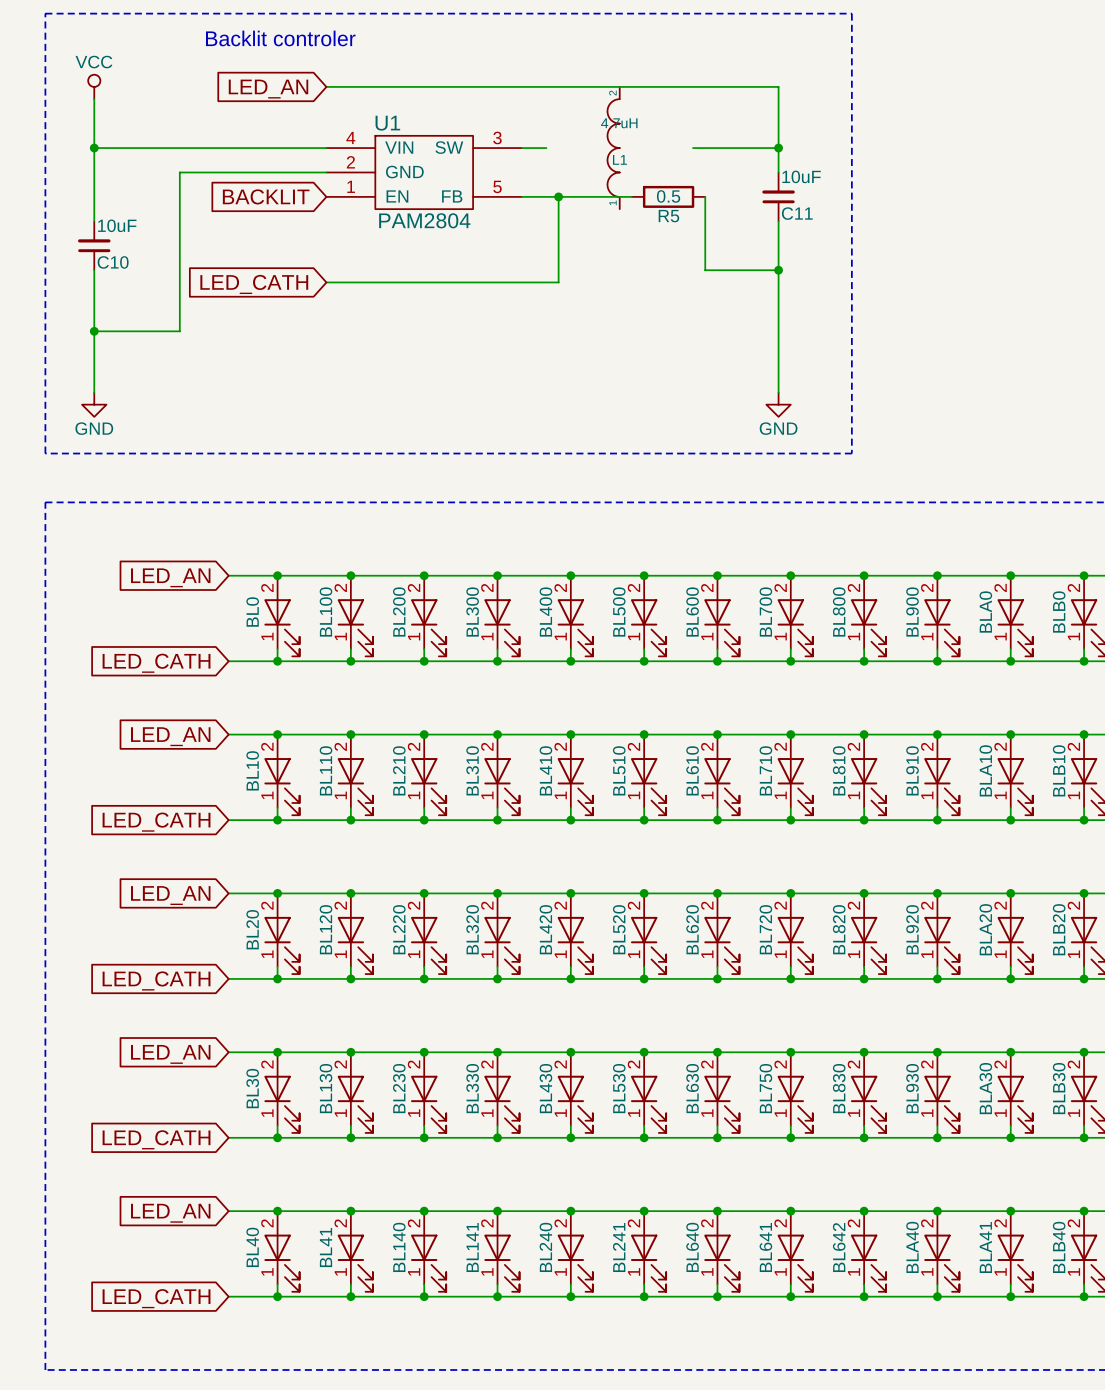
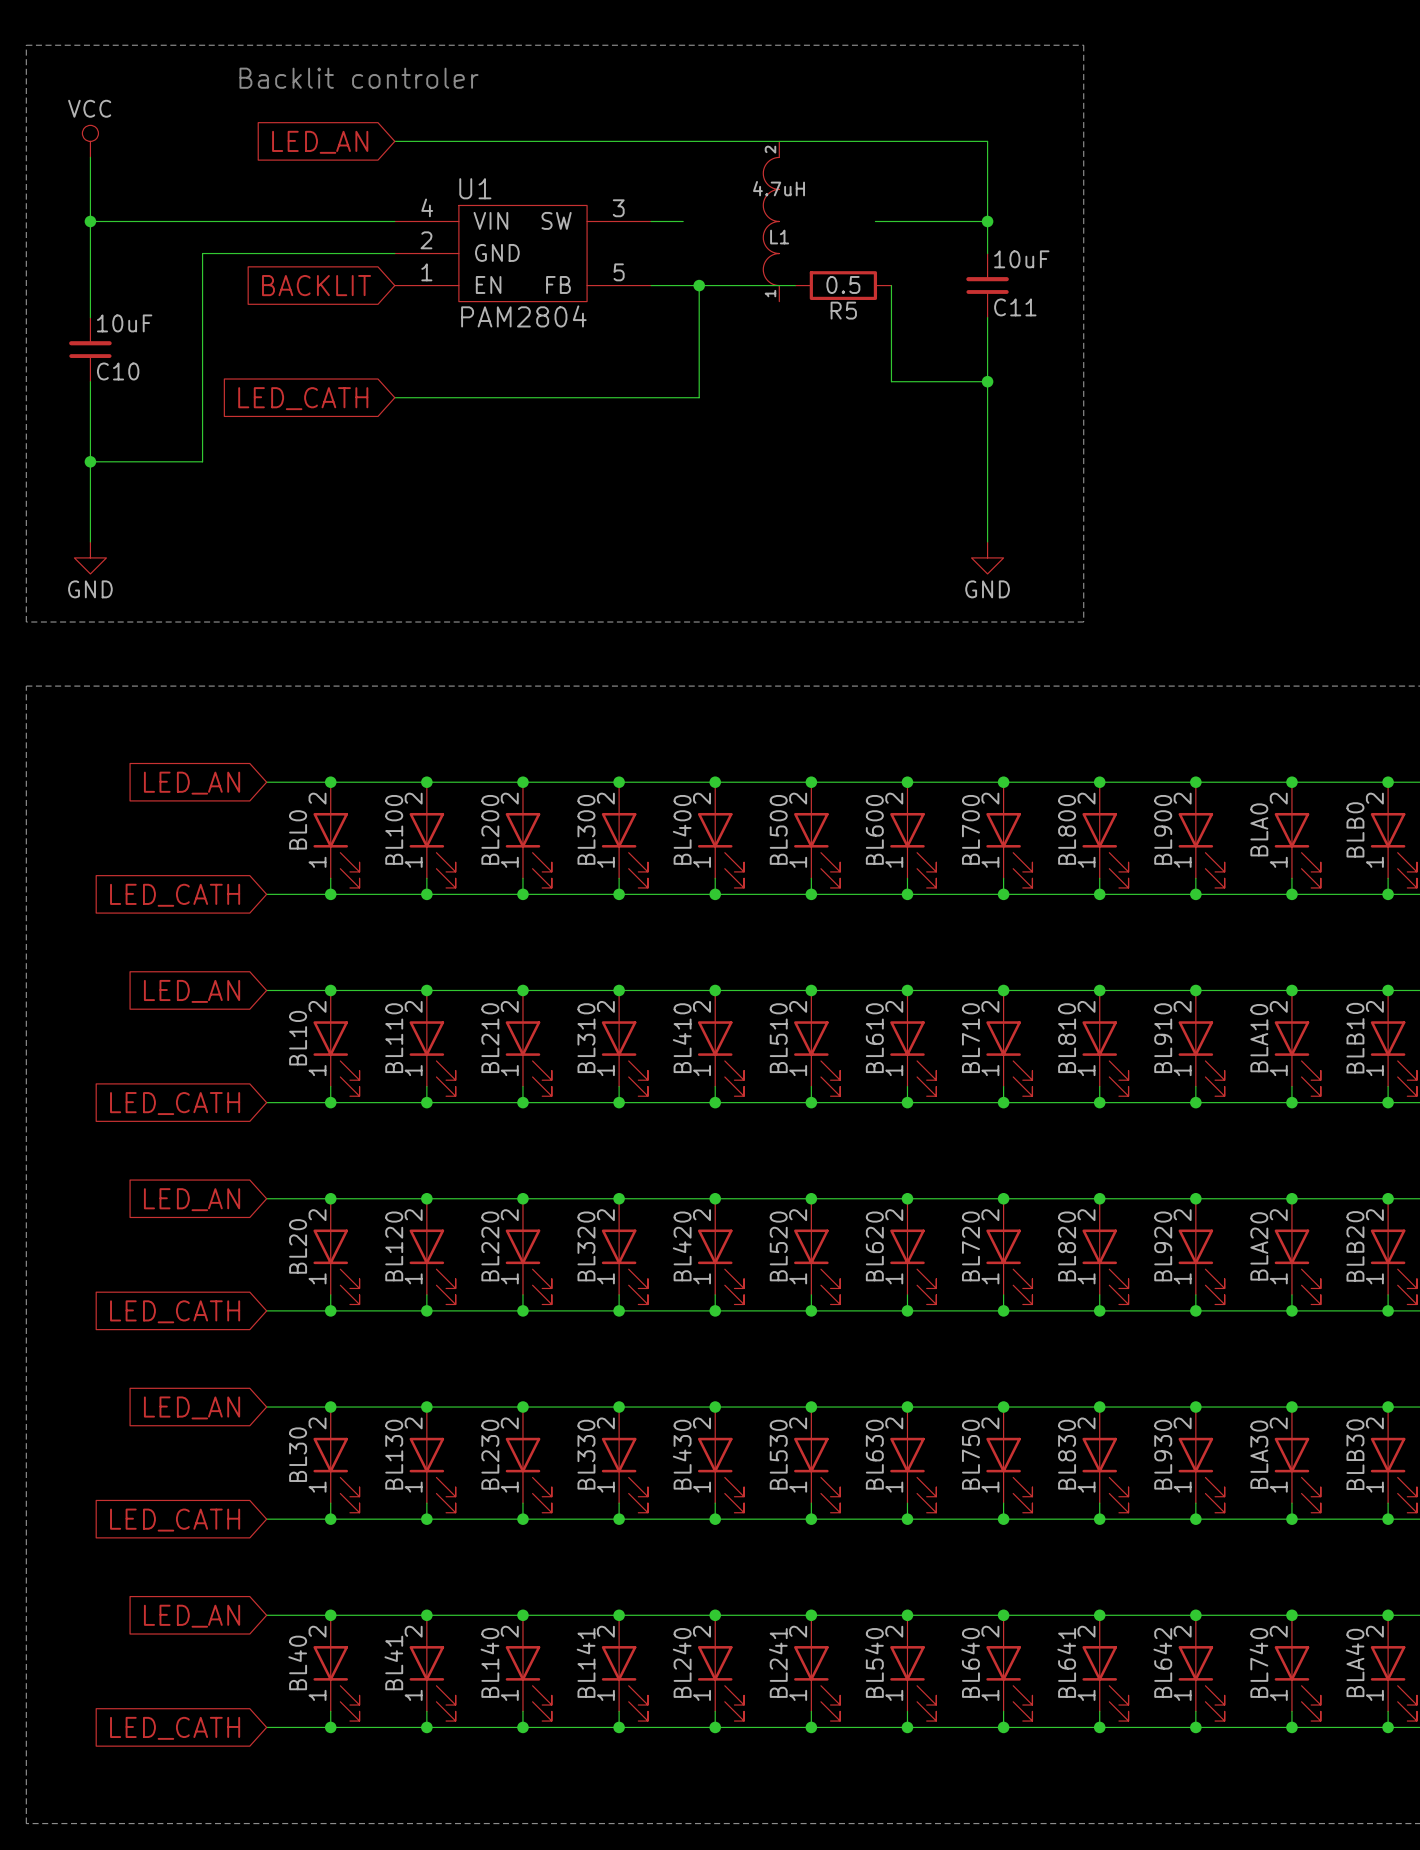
BL640 name: BL640 (692, 1247) -> BL540 (874, 1662)
BL641 name: BL641 (765, 1247) -> BL640 (970, 1662)
BL642 name: BL642 (839, 1247) -> BL641 (1066, 1662)
BLA40 name: BLA40 (912, 1247) -> BL642 (1162, 1662)
BLA41 name: BLA41 (985, 1247) -> BL740 (1258, 1662)
BLB40 name: BLB40 (1059, 1247) -> BLA40 (1355, 1662)

